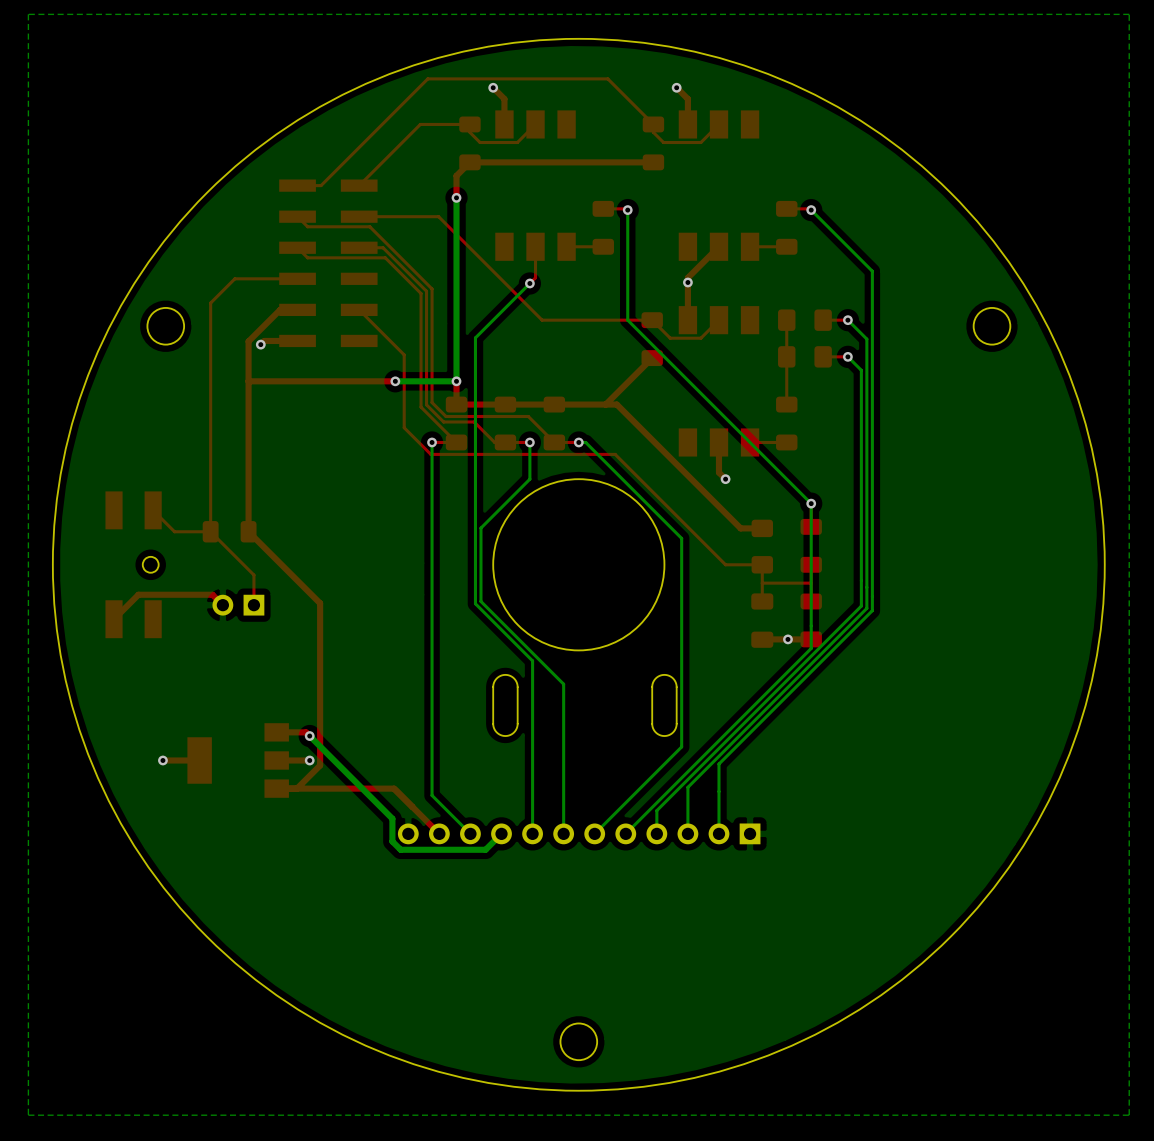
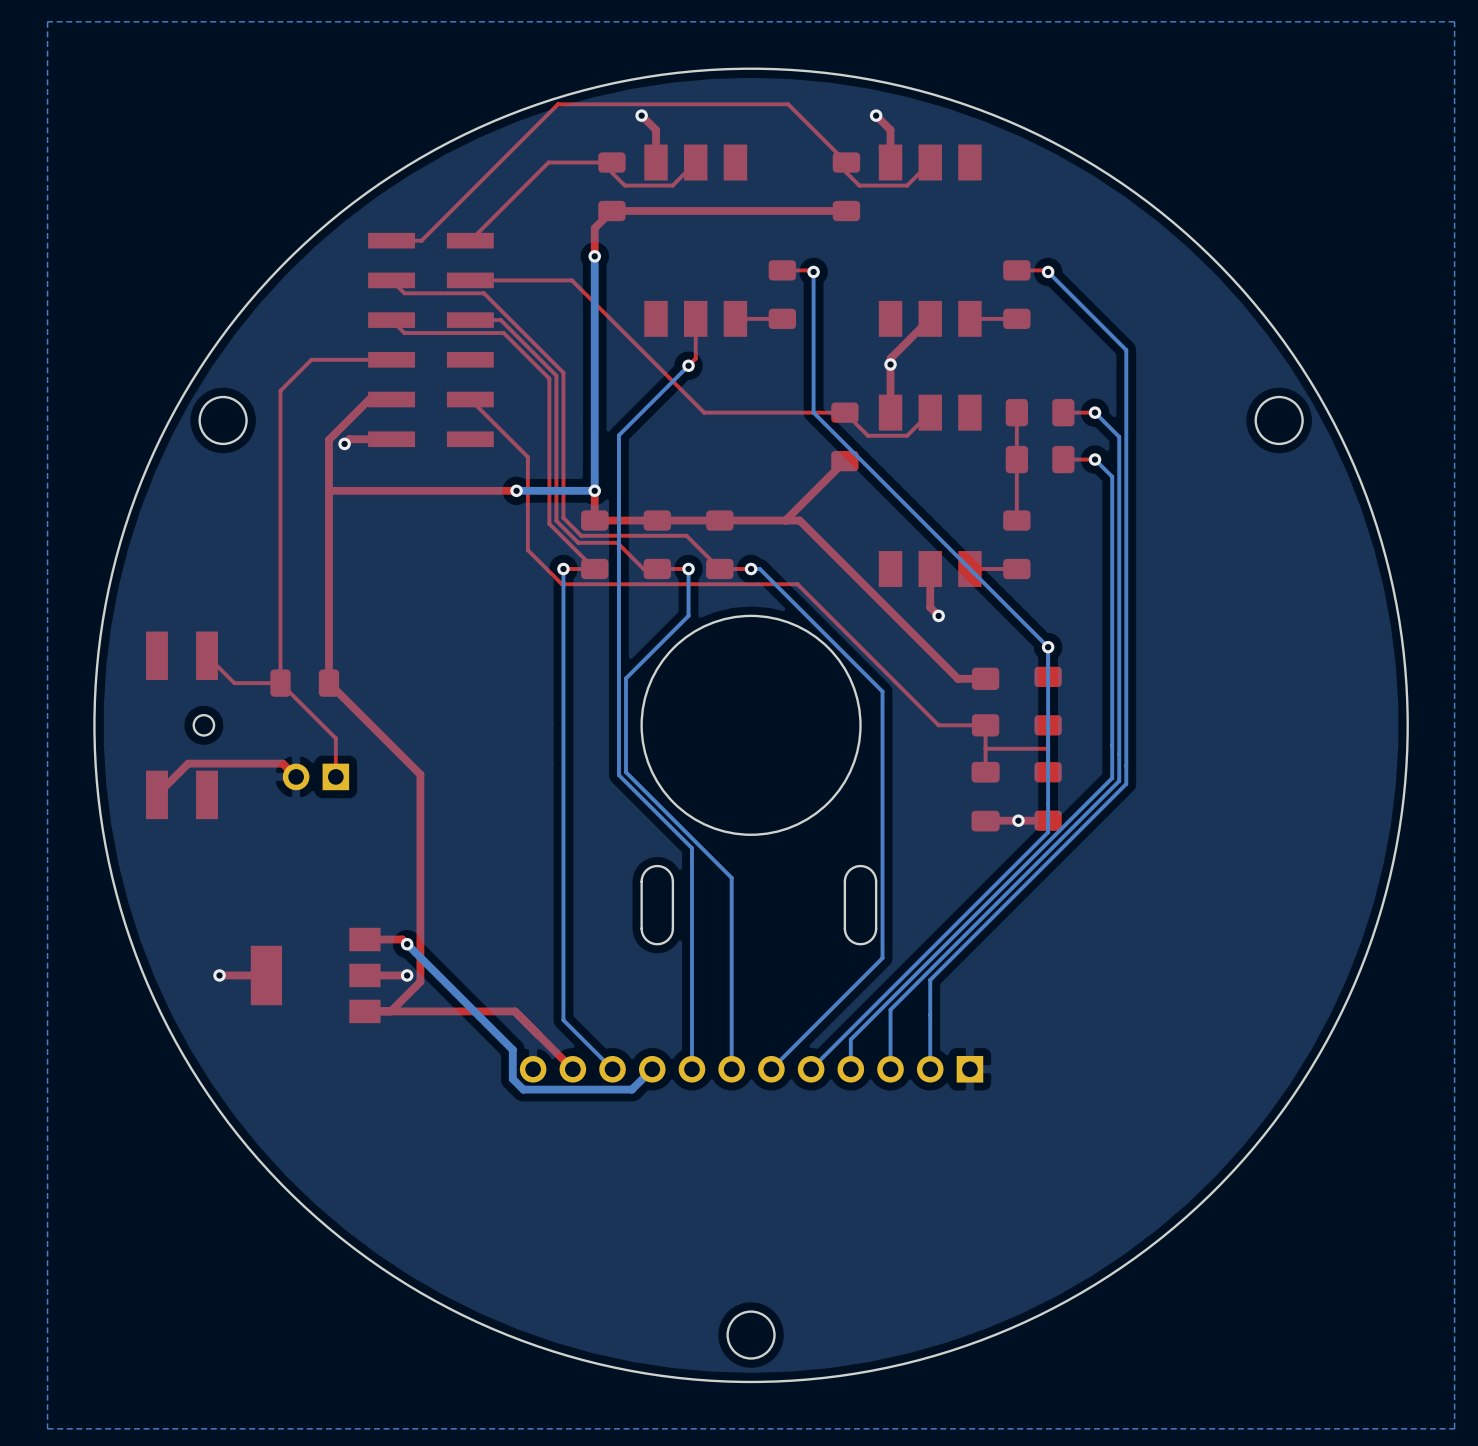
round board edge size: [51, 37, 1106, 1092] -> [93, 67, 1409, 1384]

